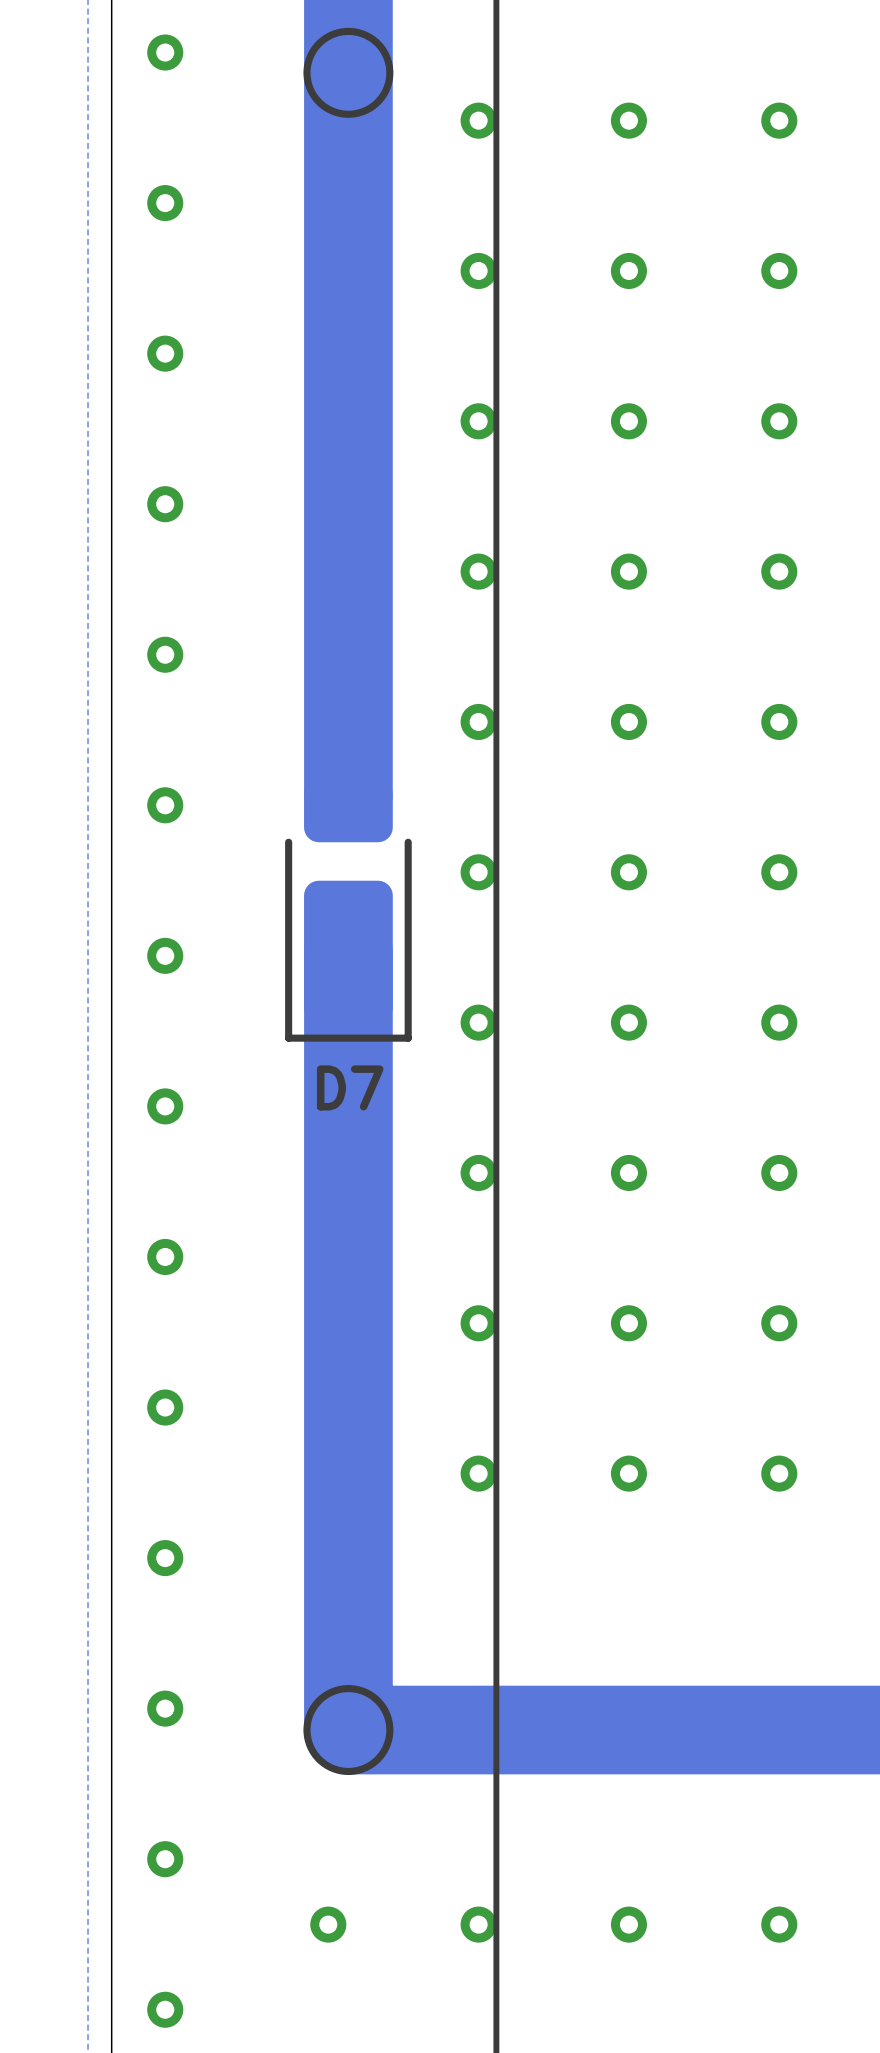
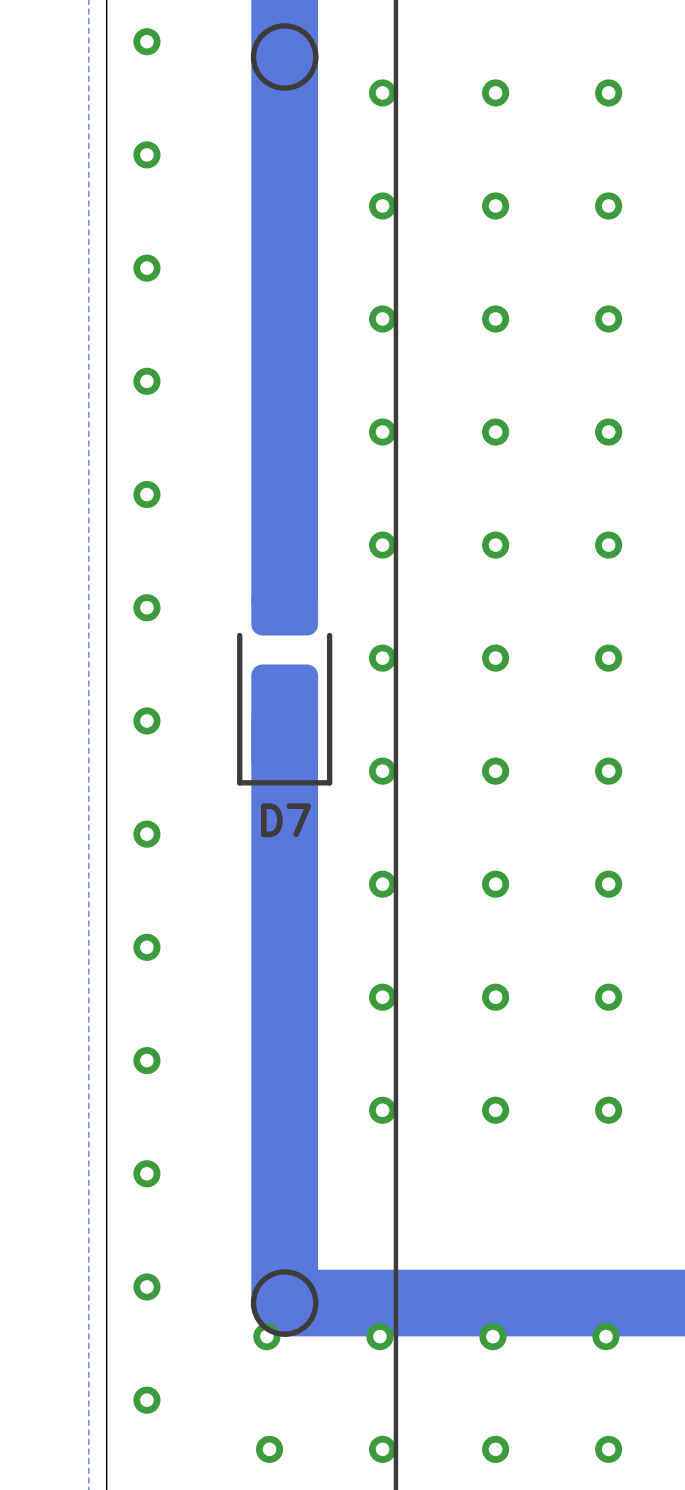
via: none -> (266, 1336)
via: none -> (379, 1336)
via: none -> (492, 1336)
via: none -> (605, 1336)

